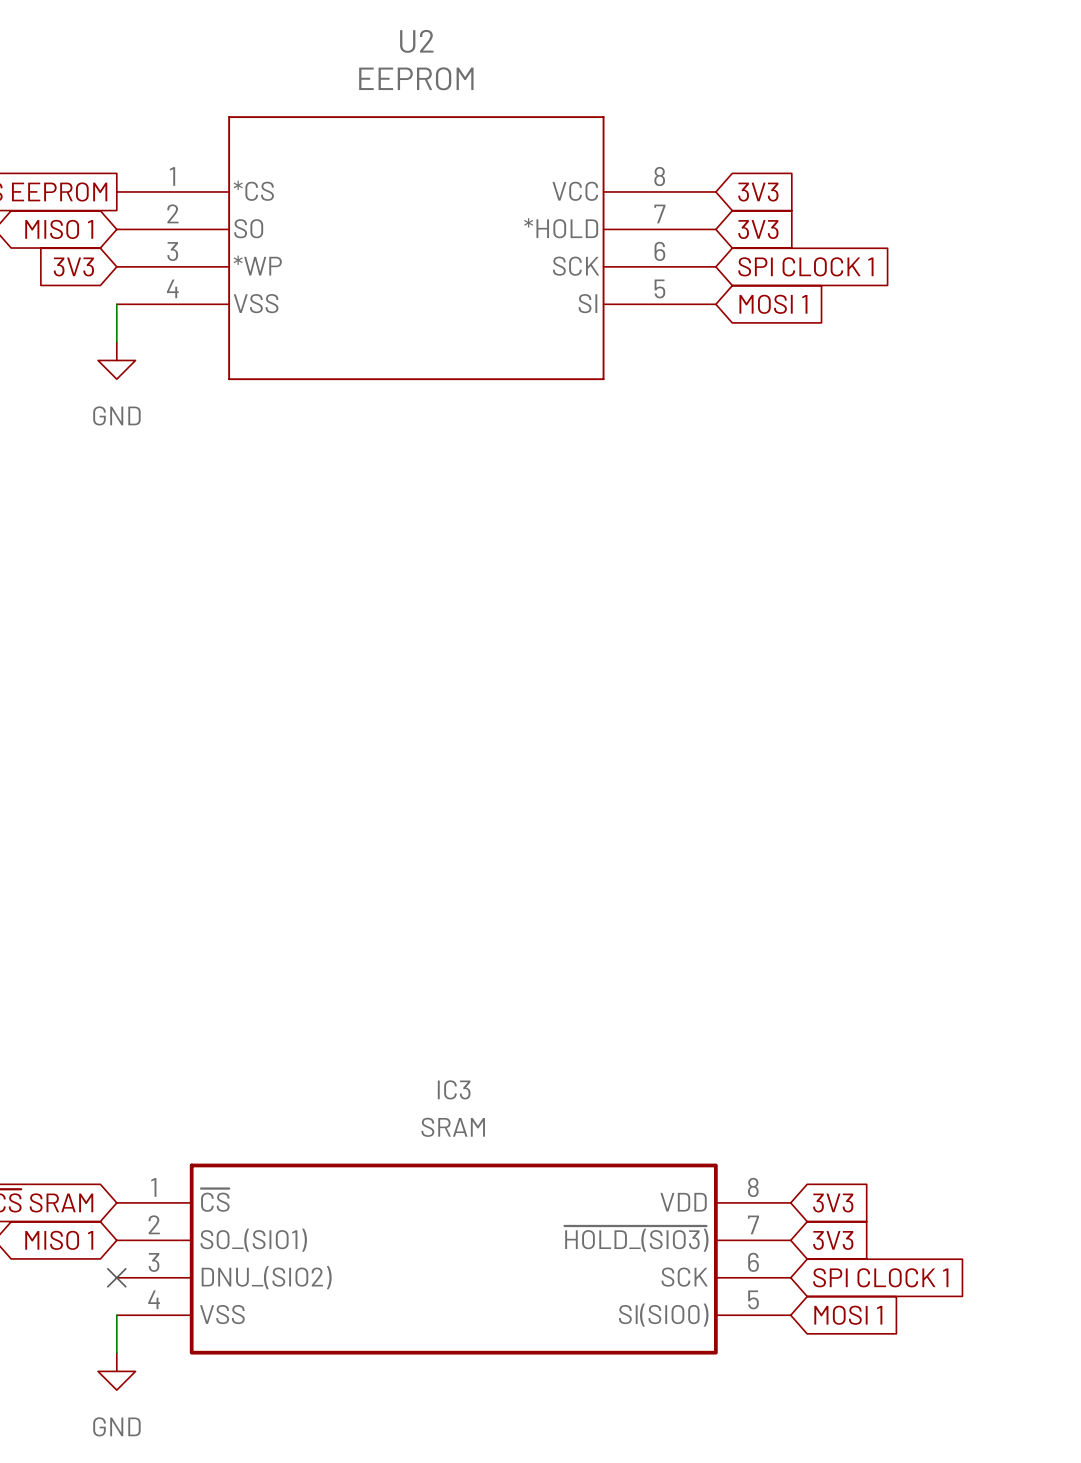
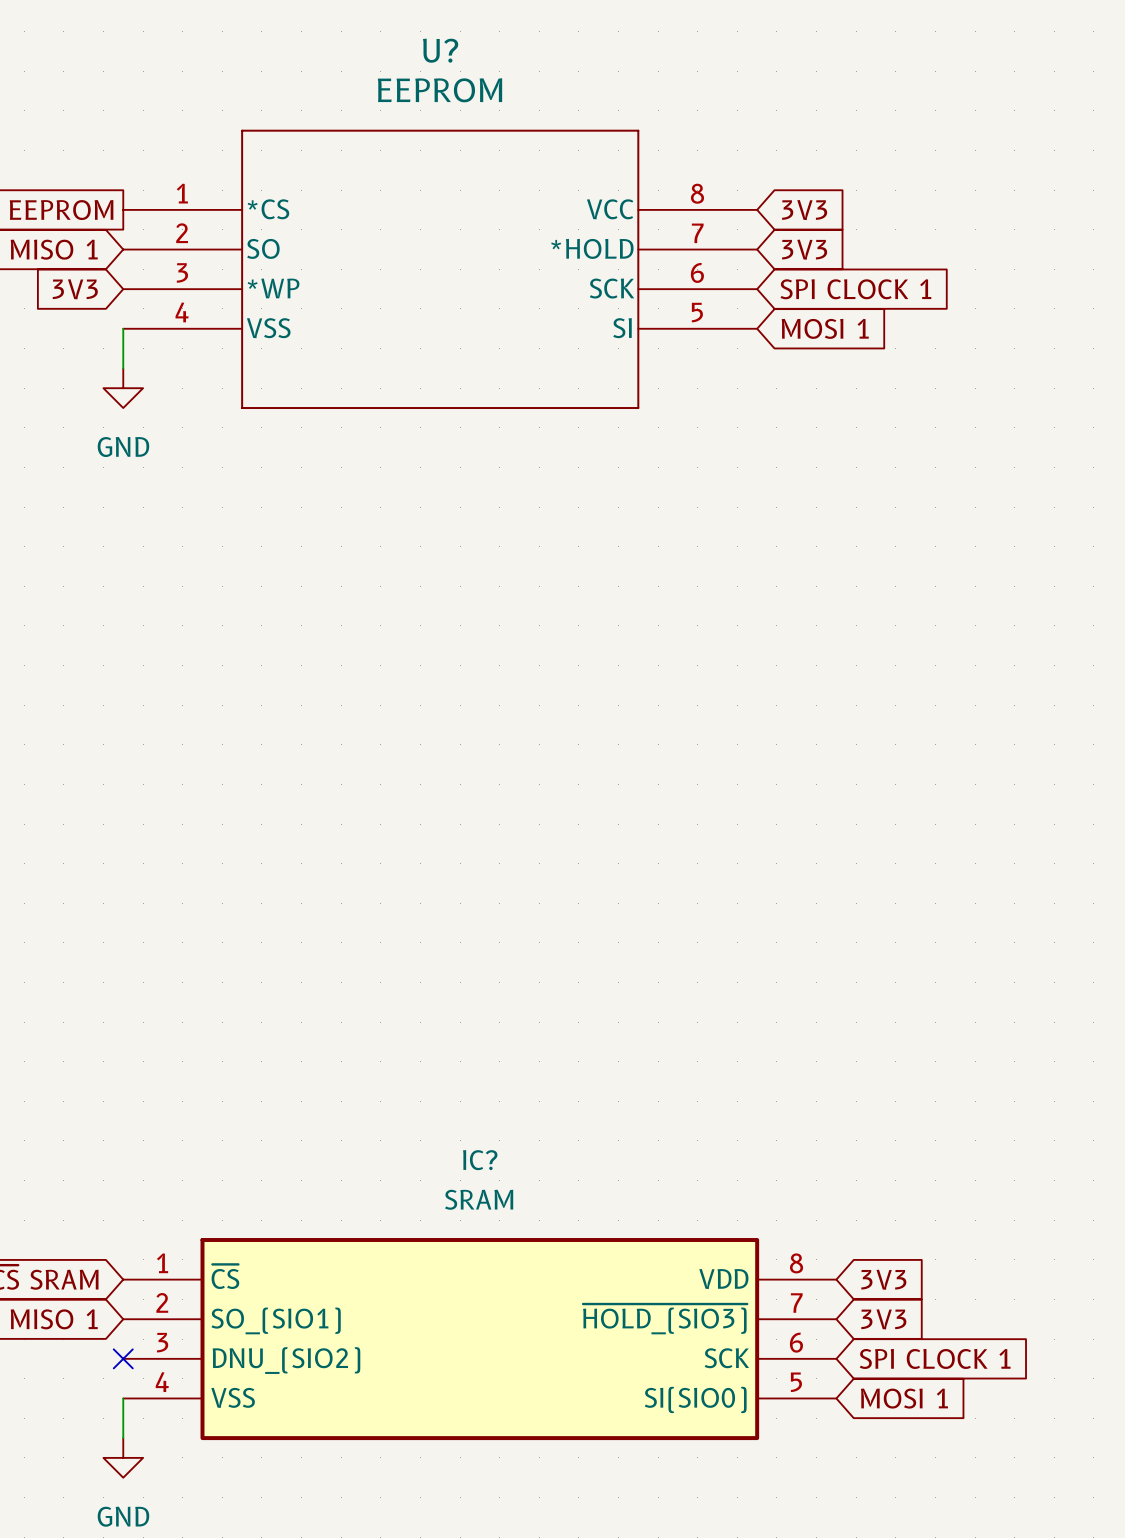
U2 name: U2 (416, 41) -> U? (440, 50)
IC3 name: IC3 (454, 1089) -> IC? (480, 1160)

